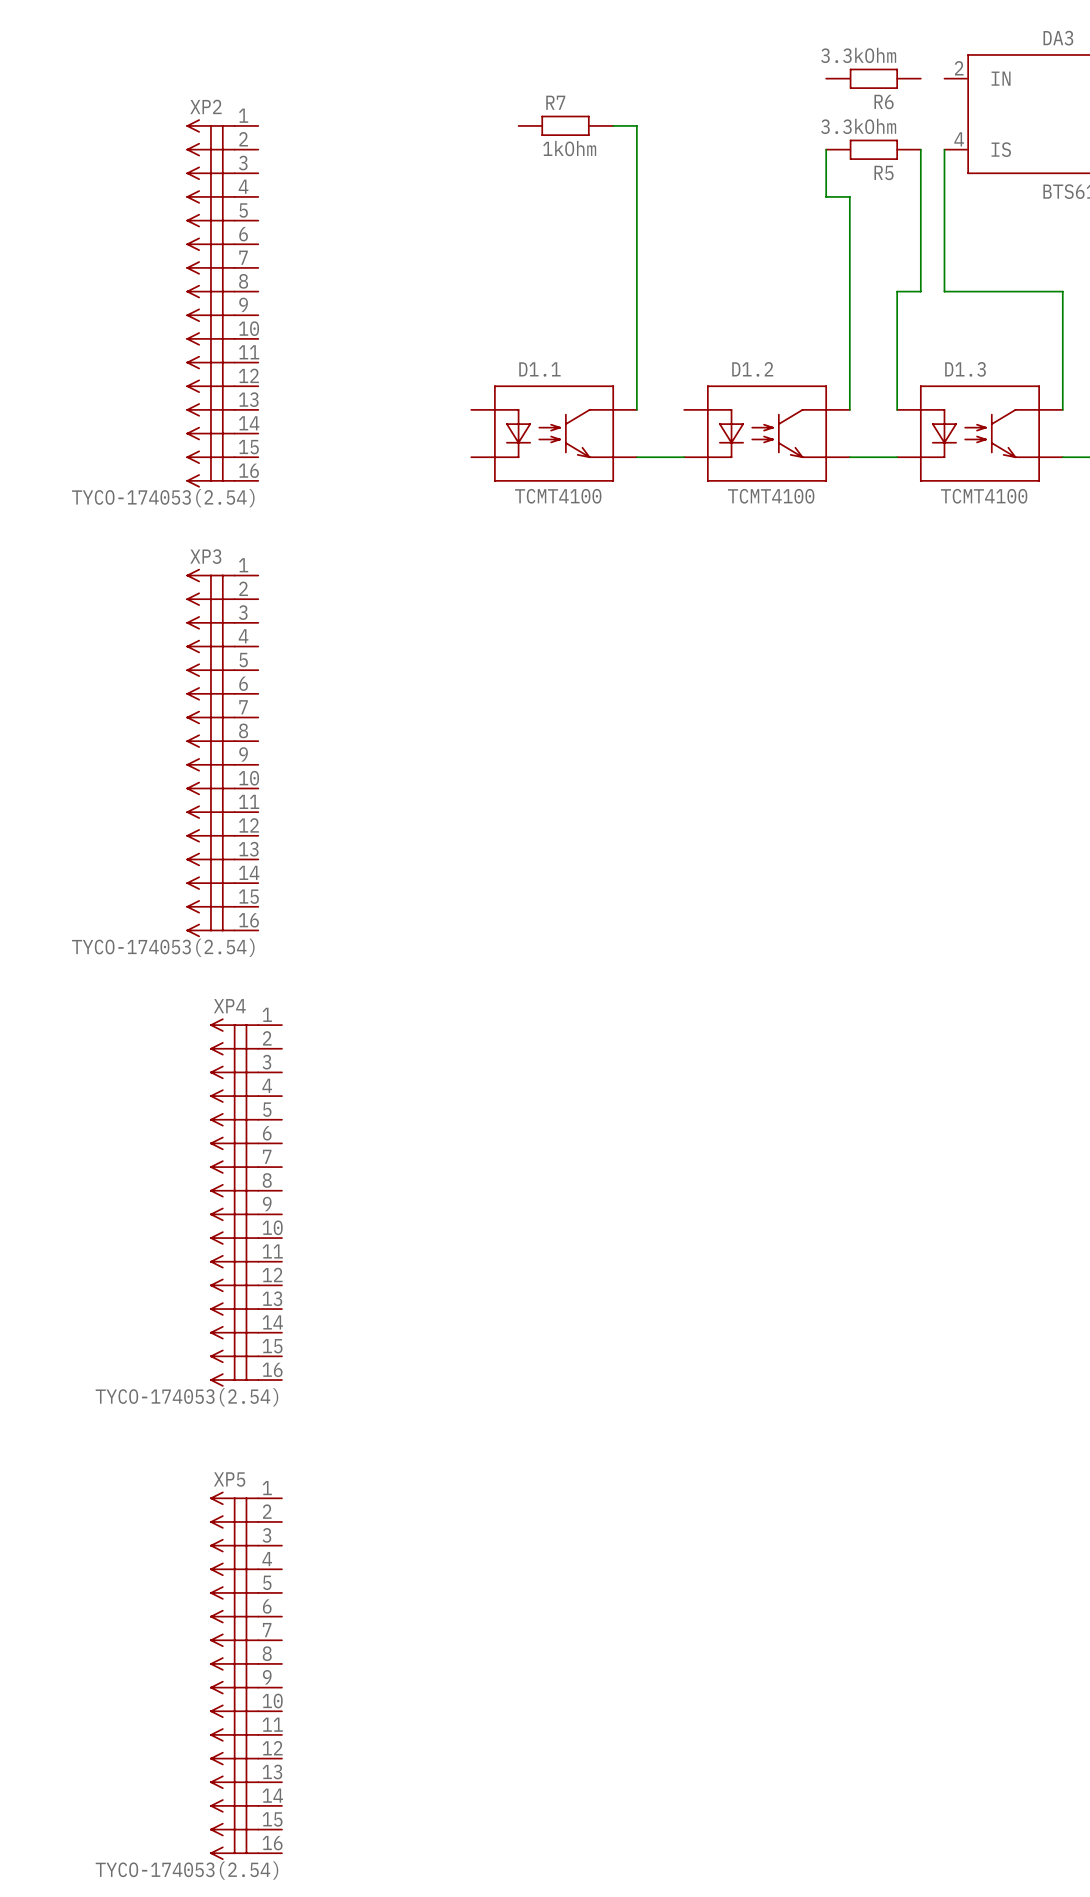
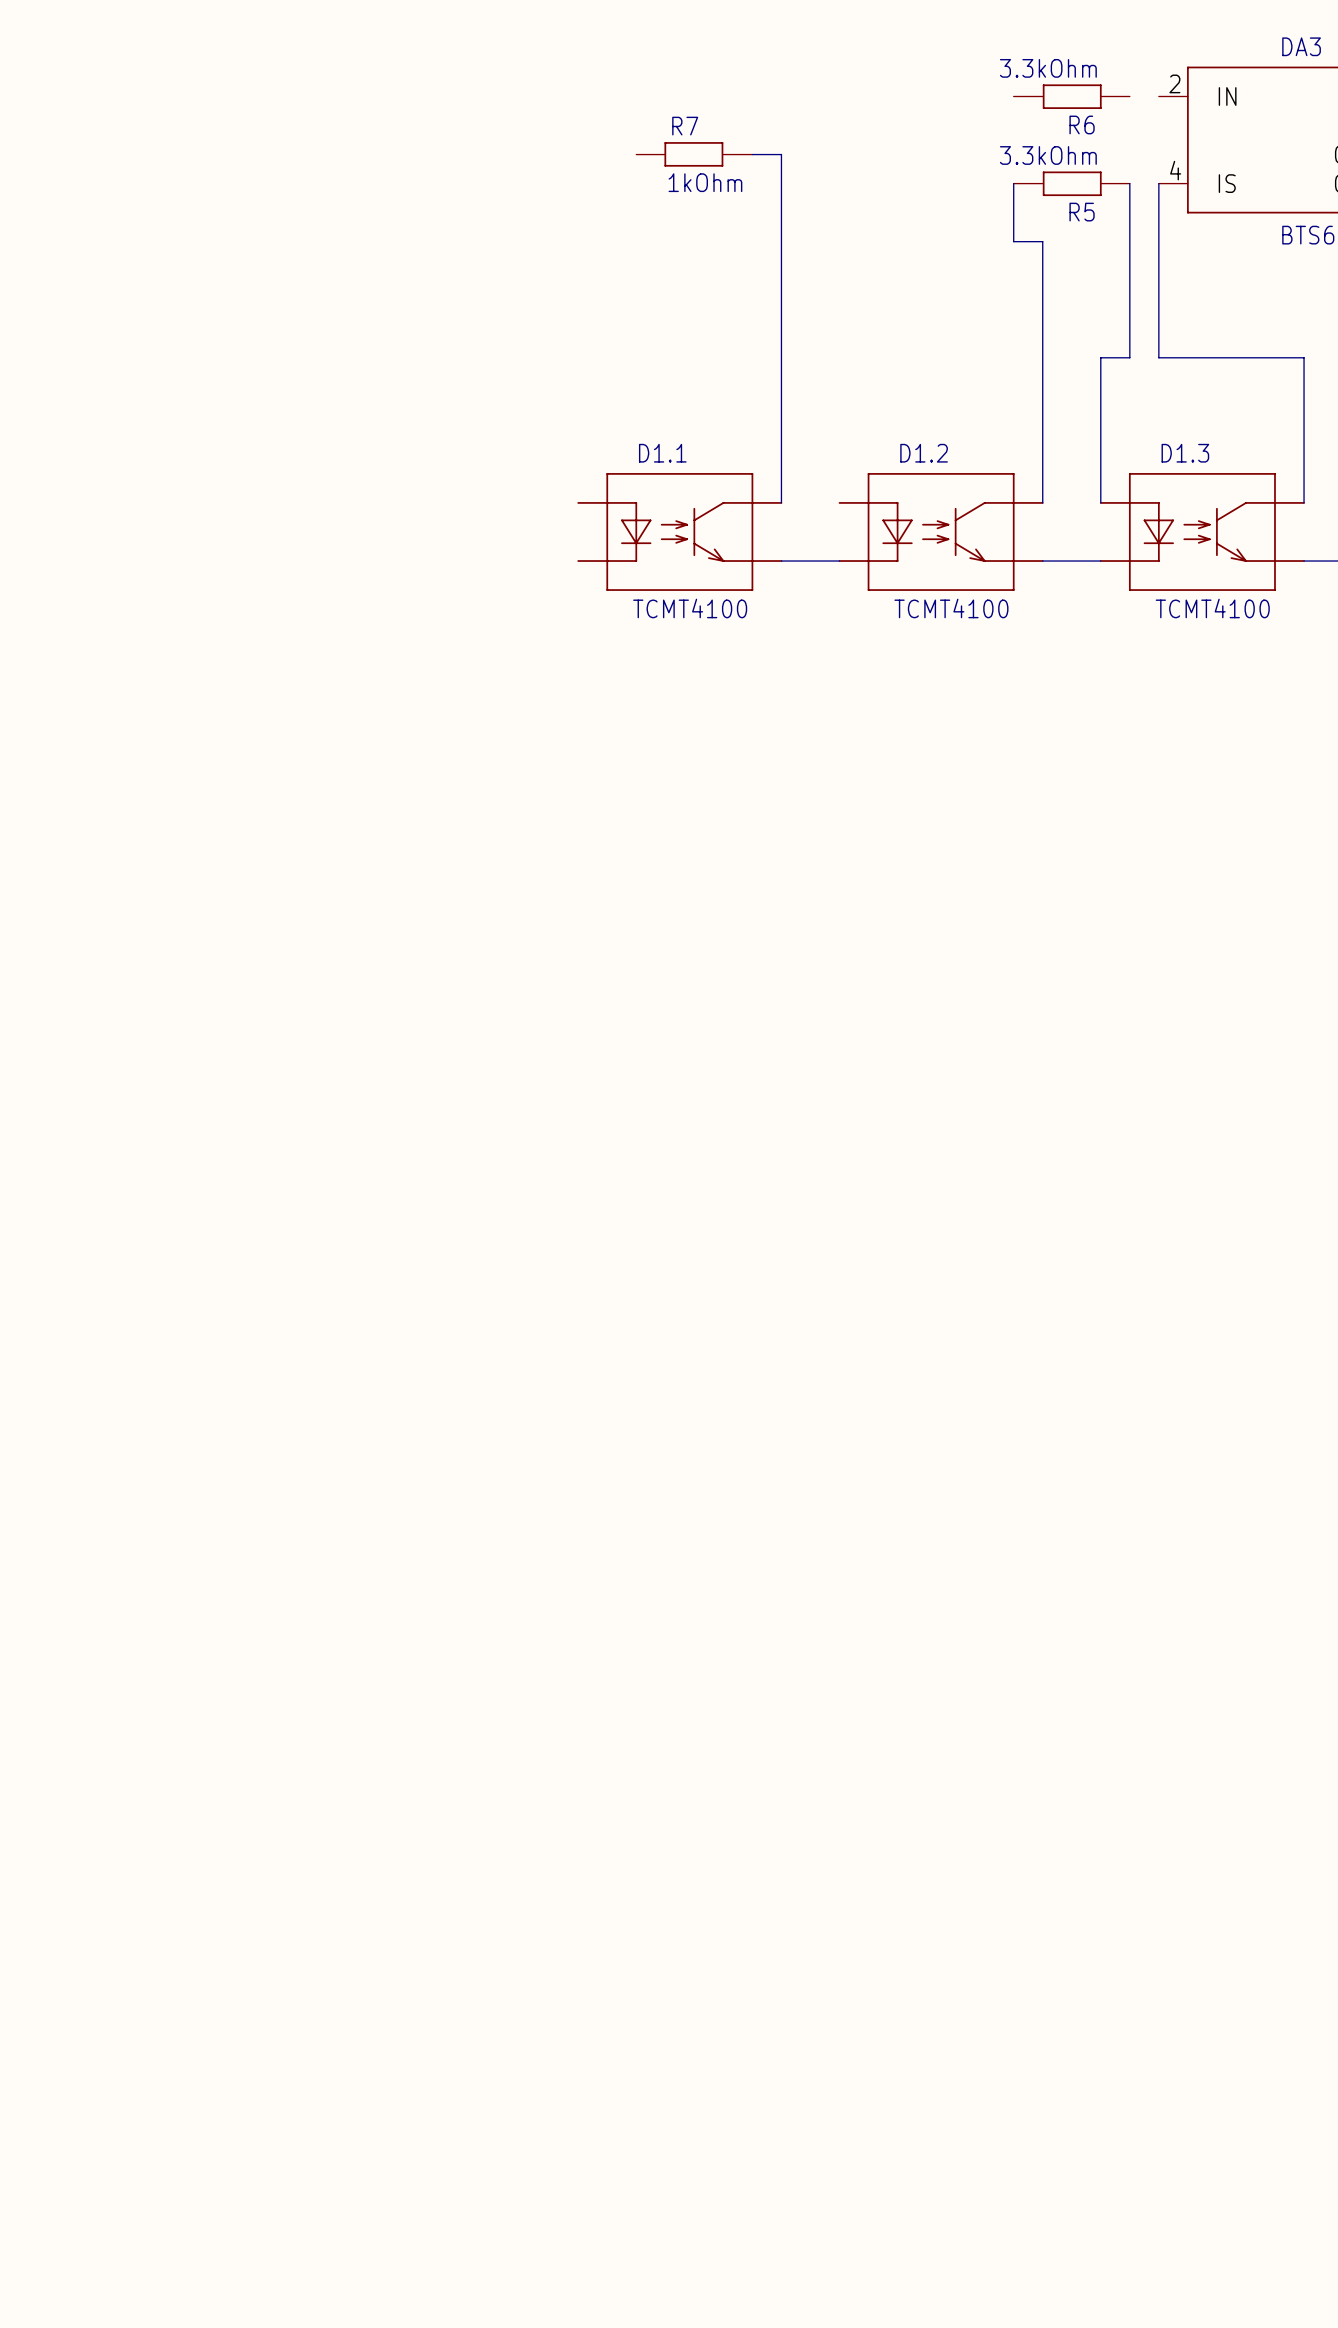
XP2: TYCO-174053(2.54) (222, 303) -> none
XP3: TYCO-174053(2.54) (222, 752) -> none
XP4: TYCO-174053(2.54) (246, 1202) -> none
XP5: TYCO-174053(2.54) (246, 1675) -> none

